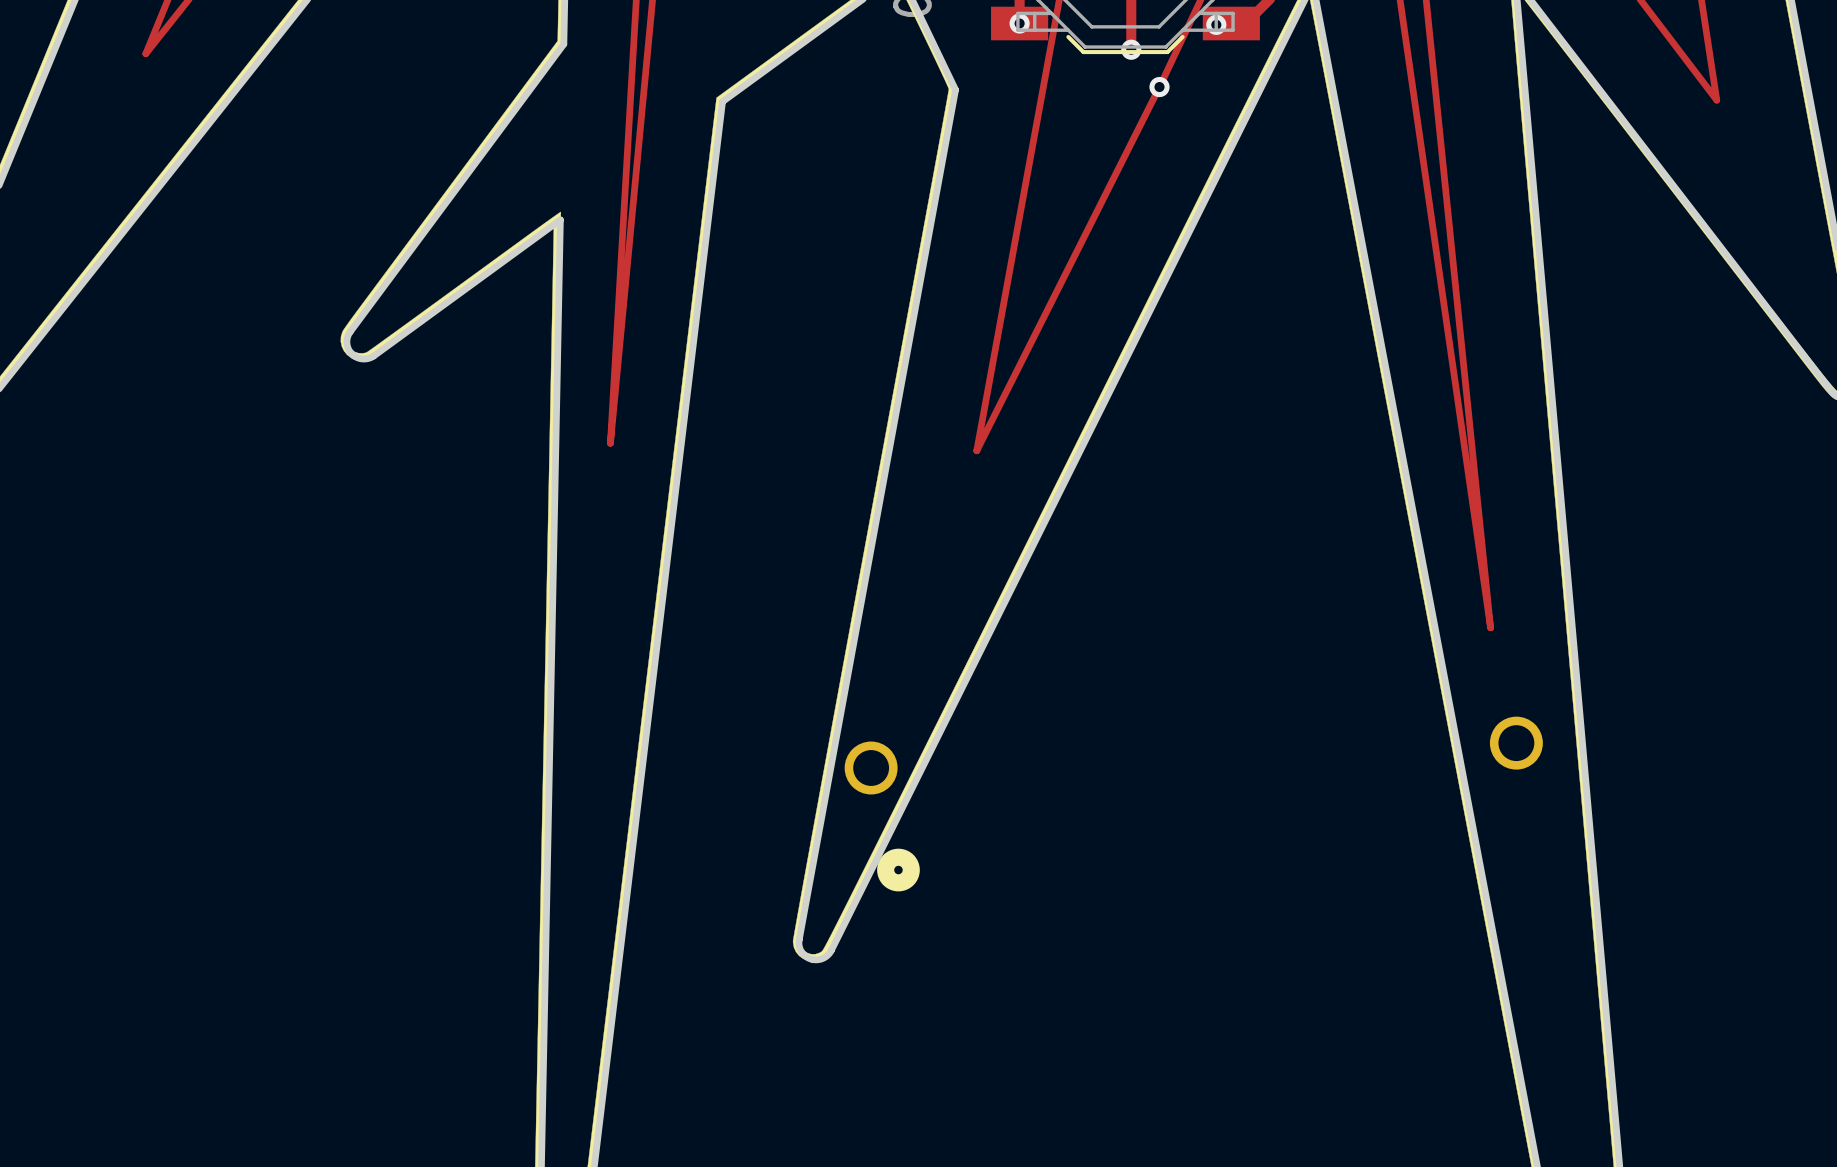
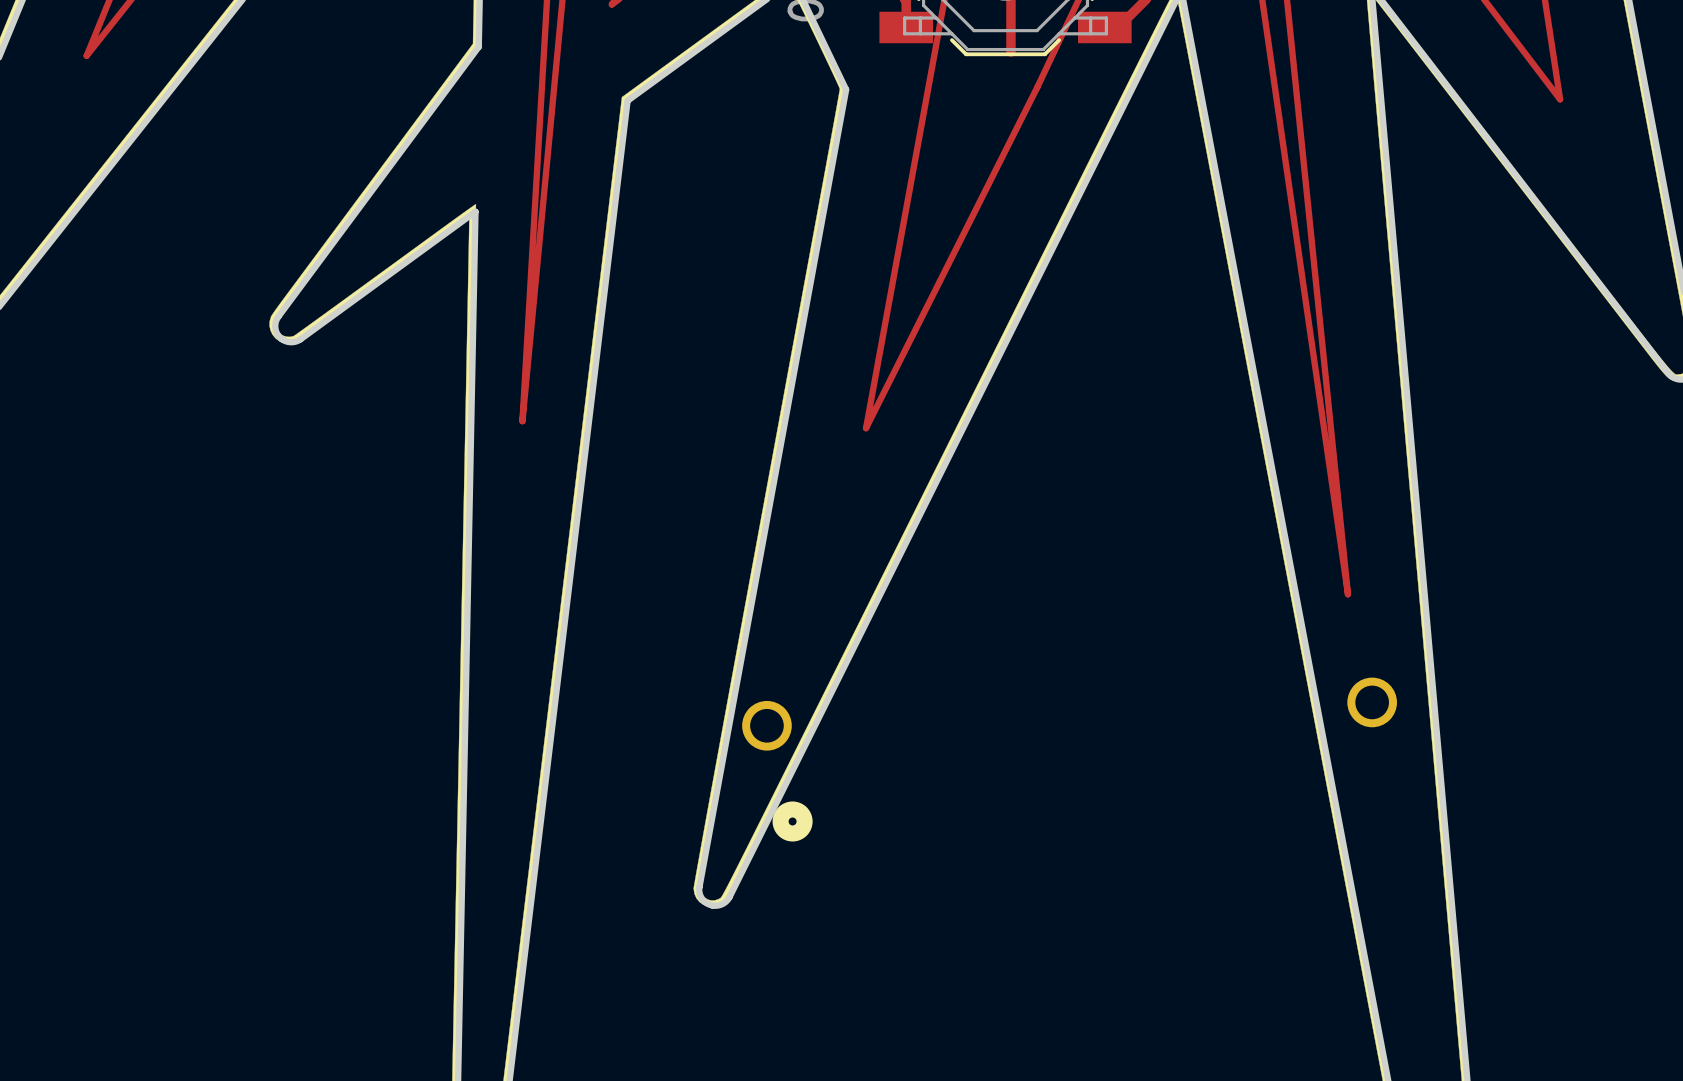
via: (1019, 23) -> none
via: (1216, 24) -> none
via: (1131, 49) -> none
via: (1159, 87) -> none

